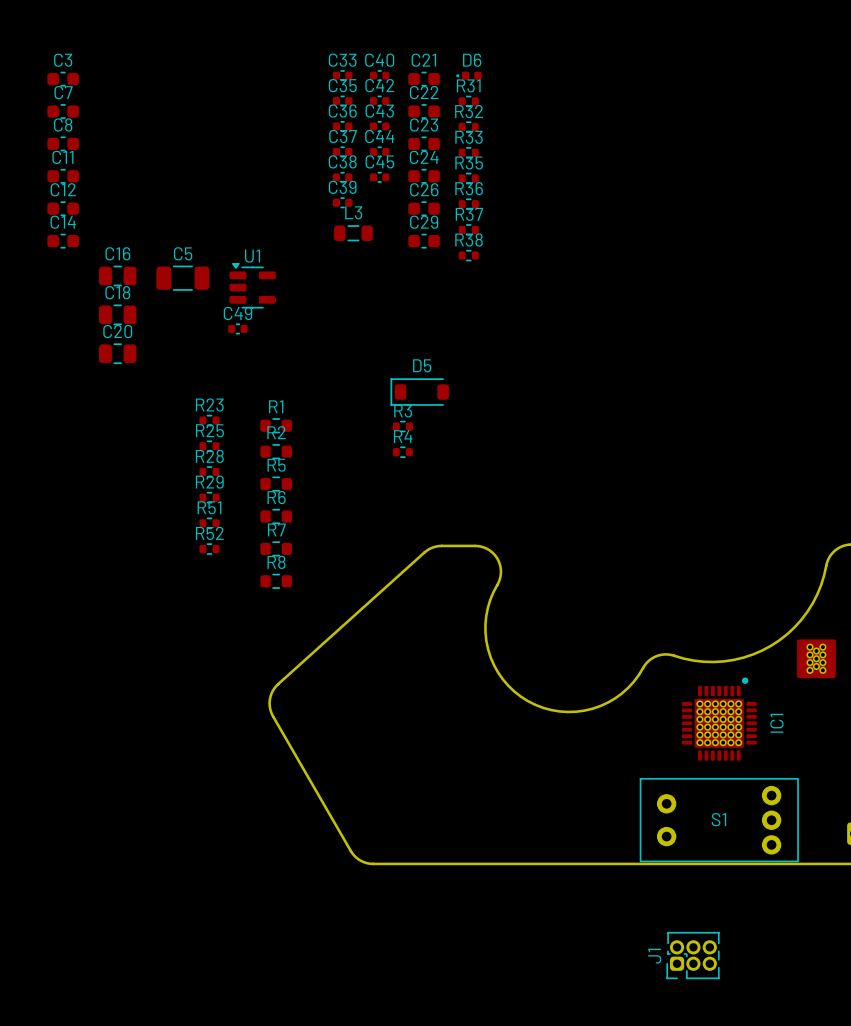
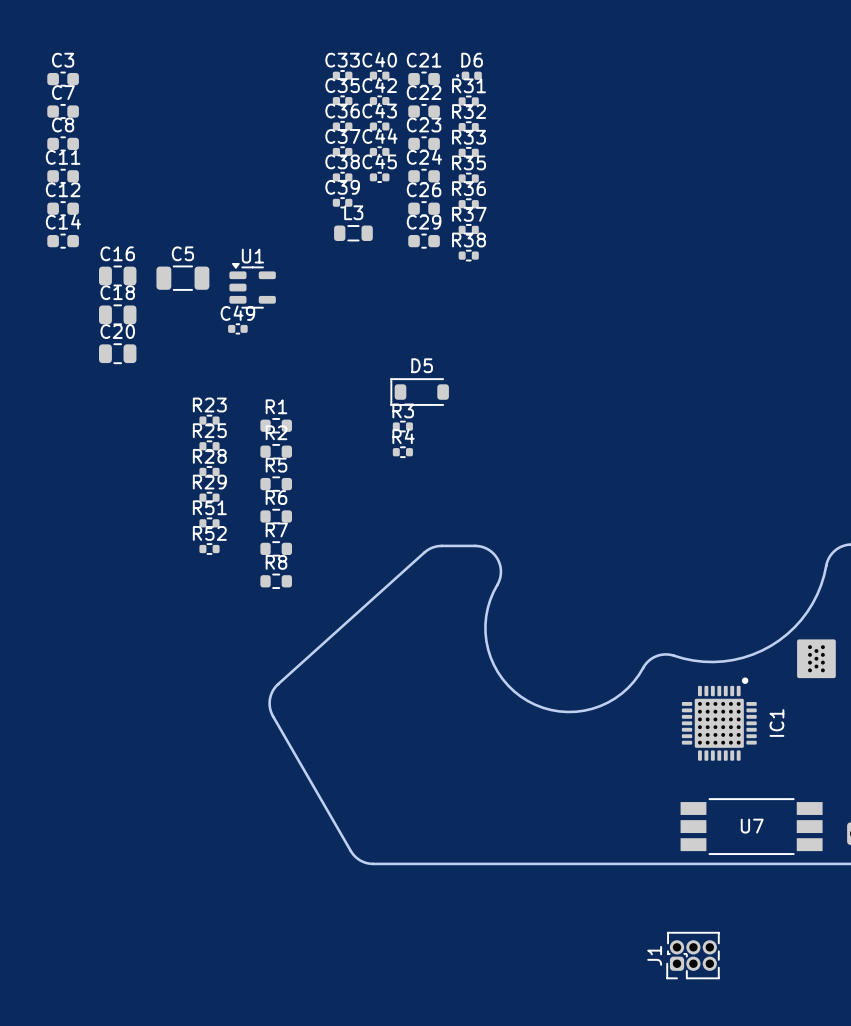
S1: (719, 820) -> none
U7: none -> (751, 826)

